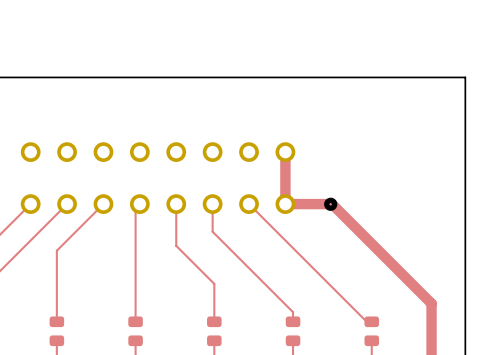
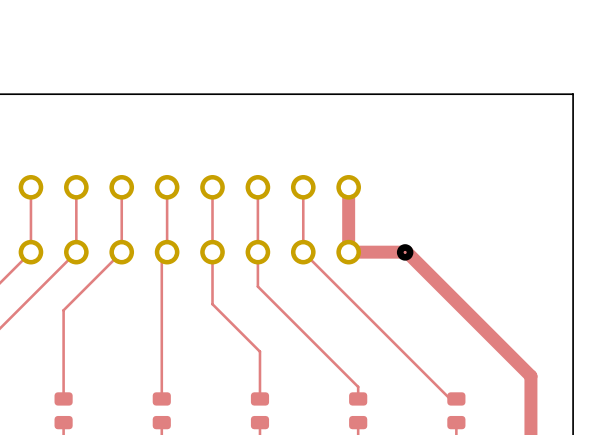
top track: none -> (30, 187) (30, 252)
top track: none -> (76, 187) (76, 252)
top track: none -> (121, 187) (121, 252)
top track: none -> (167, 187) (167, 252)
top track: none -> (212, 187) (212, 252)
top track: none -> (257, 187) (257, 252)
top track: none -> (303, 187) (303, 252)

